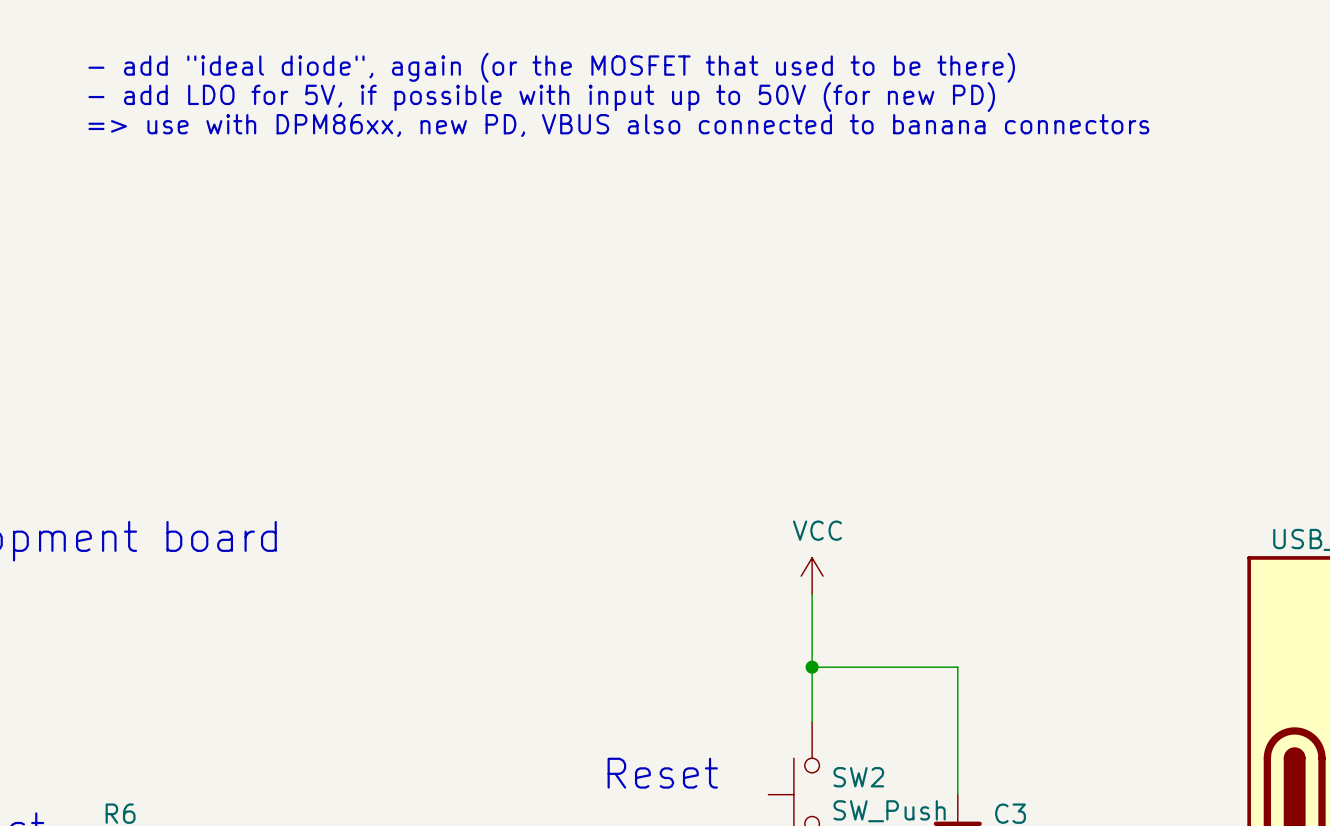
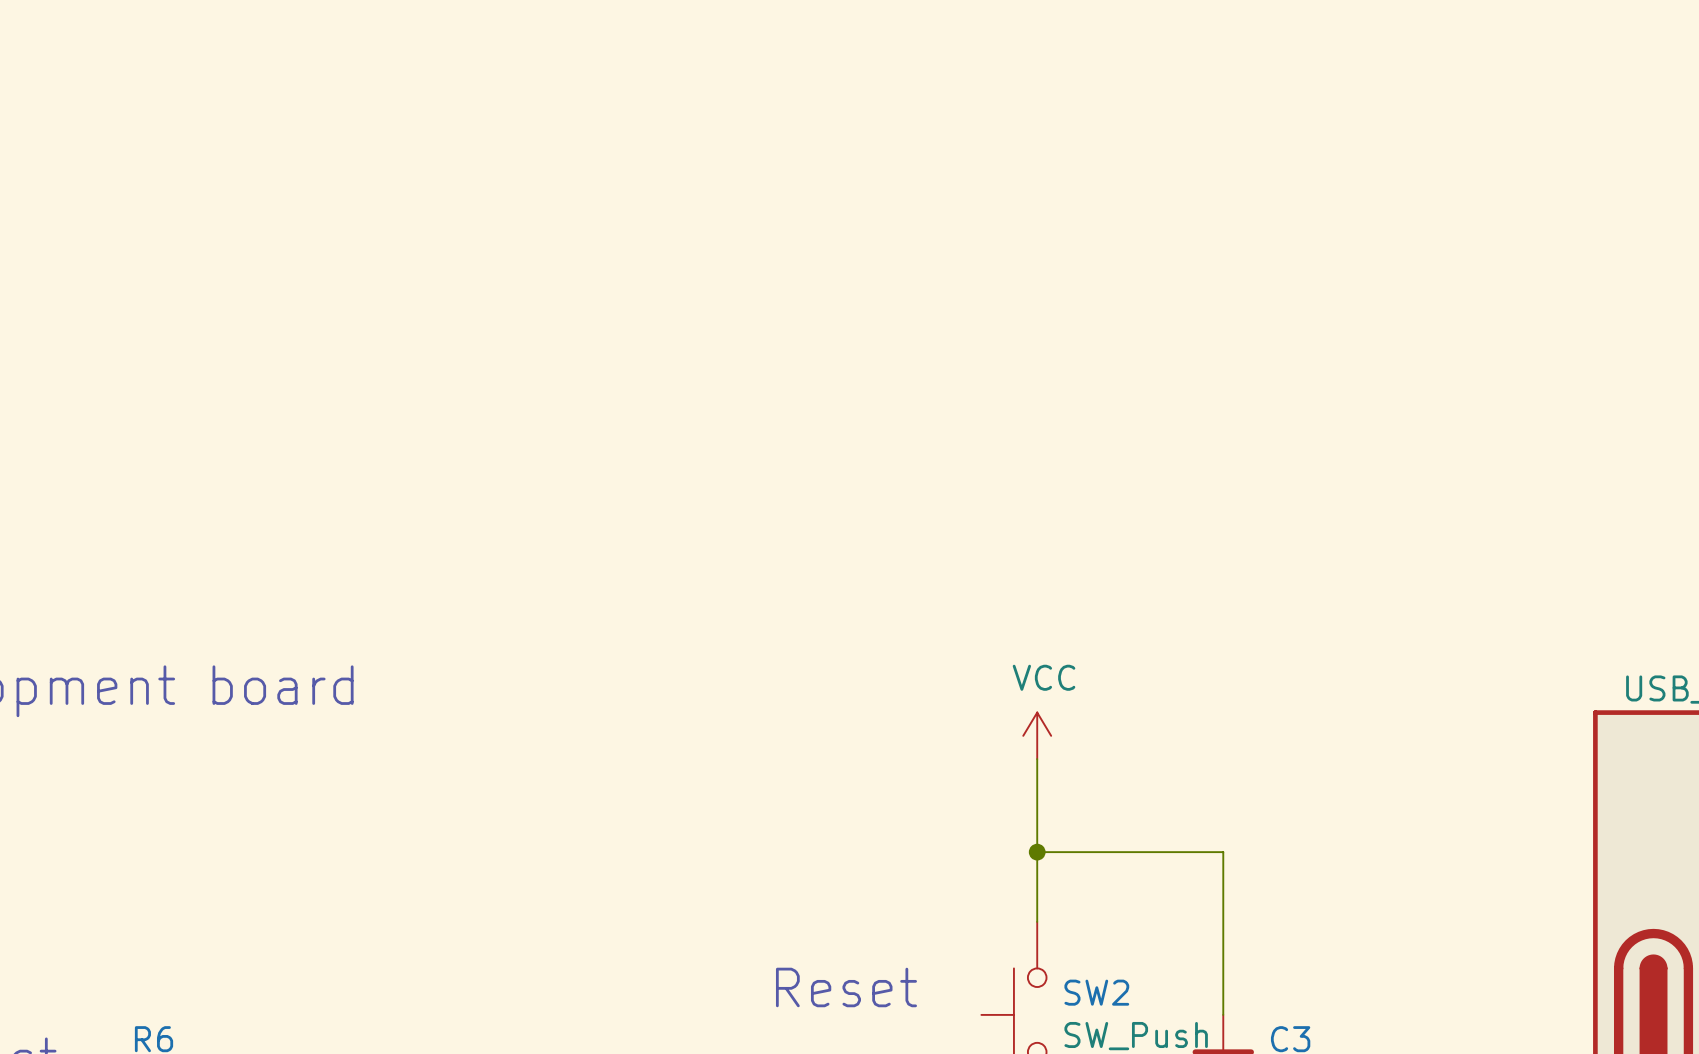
text: - add "ideal diode", again (or the MOSFET that used to be there) (551, 67) -> none
text: - add LDO for 5V, if possible with input up to 50V (for new PD) (541, 97) -> none
text: => use with DPM86xx, new PD, VBUS also connected to banana connectors (618, 125) -> none

